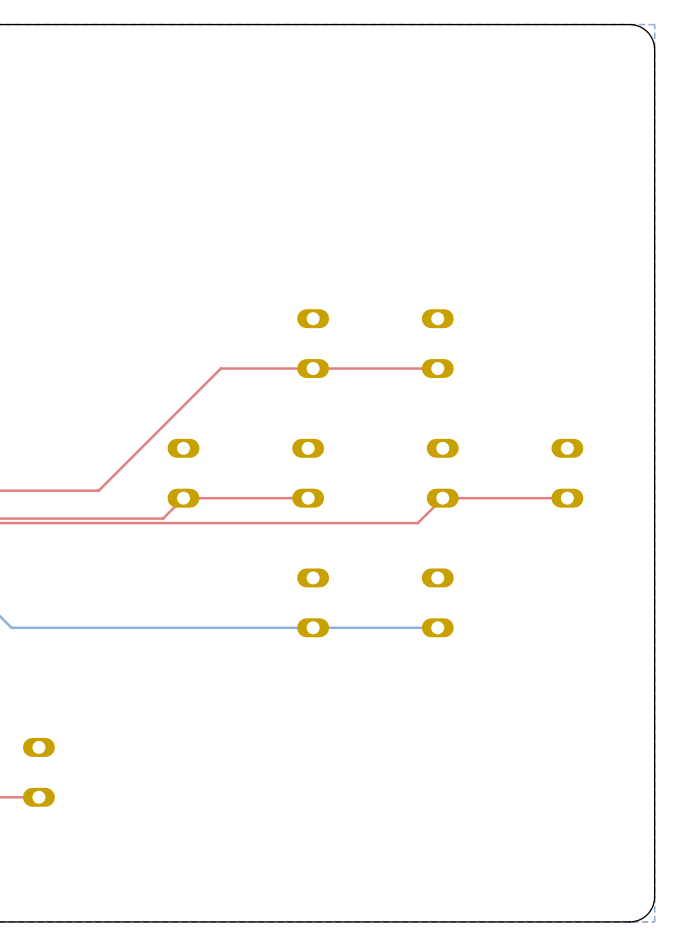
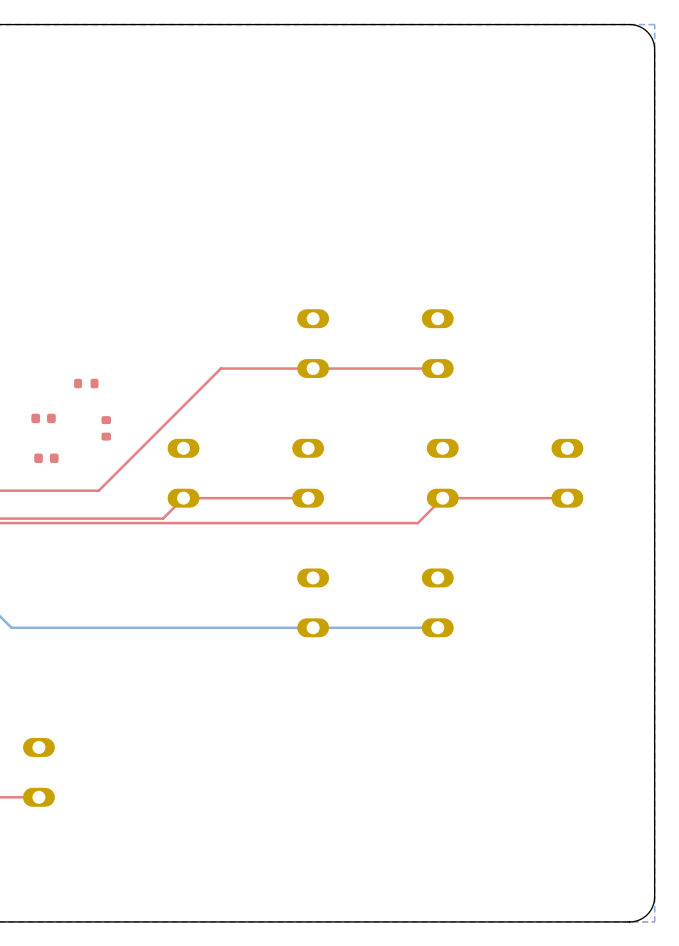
part: none -> (86, 383)
part: none -> (43, 418)
part: none -> (106, 428)
part: none -> (46, 458)

